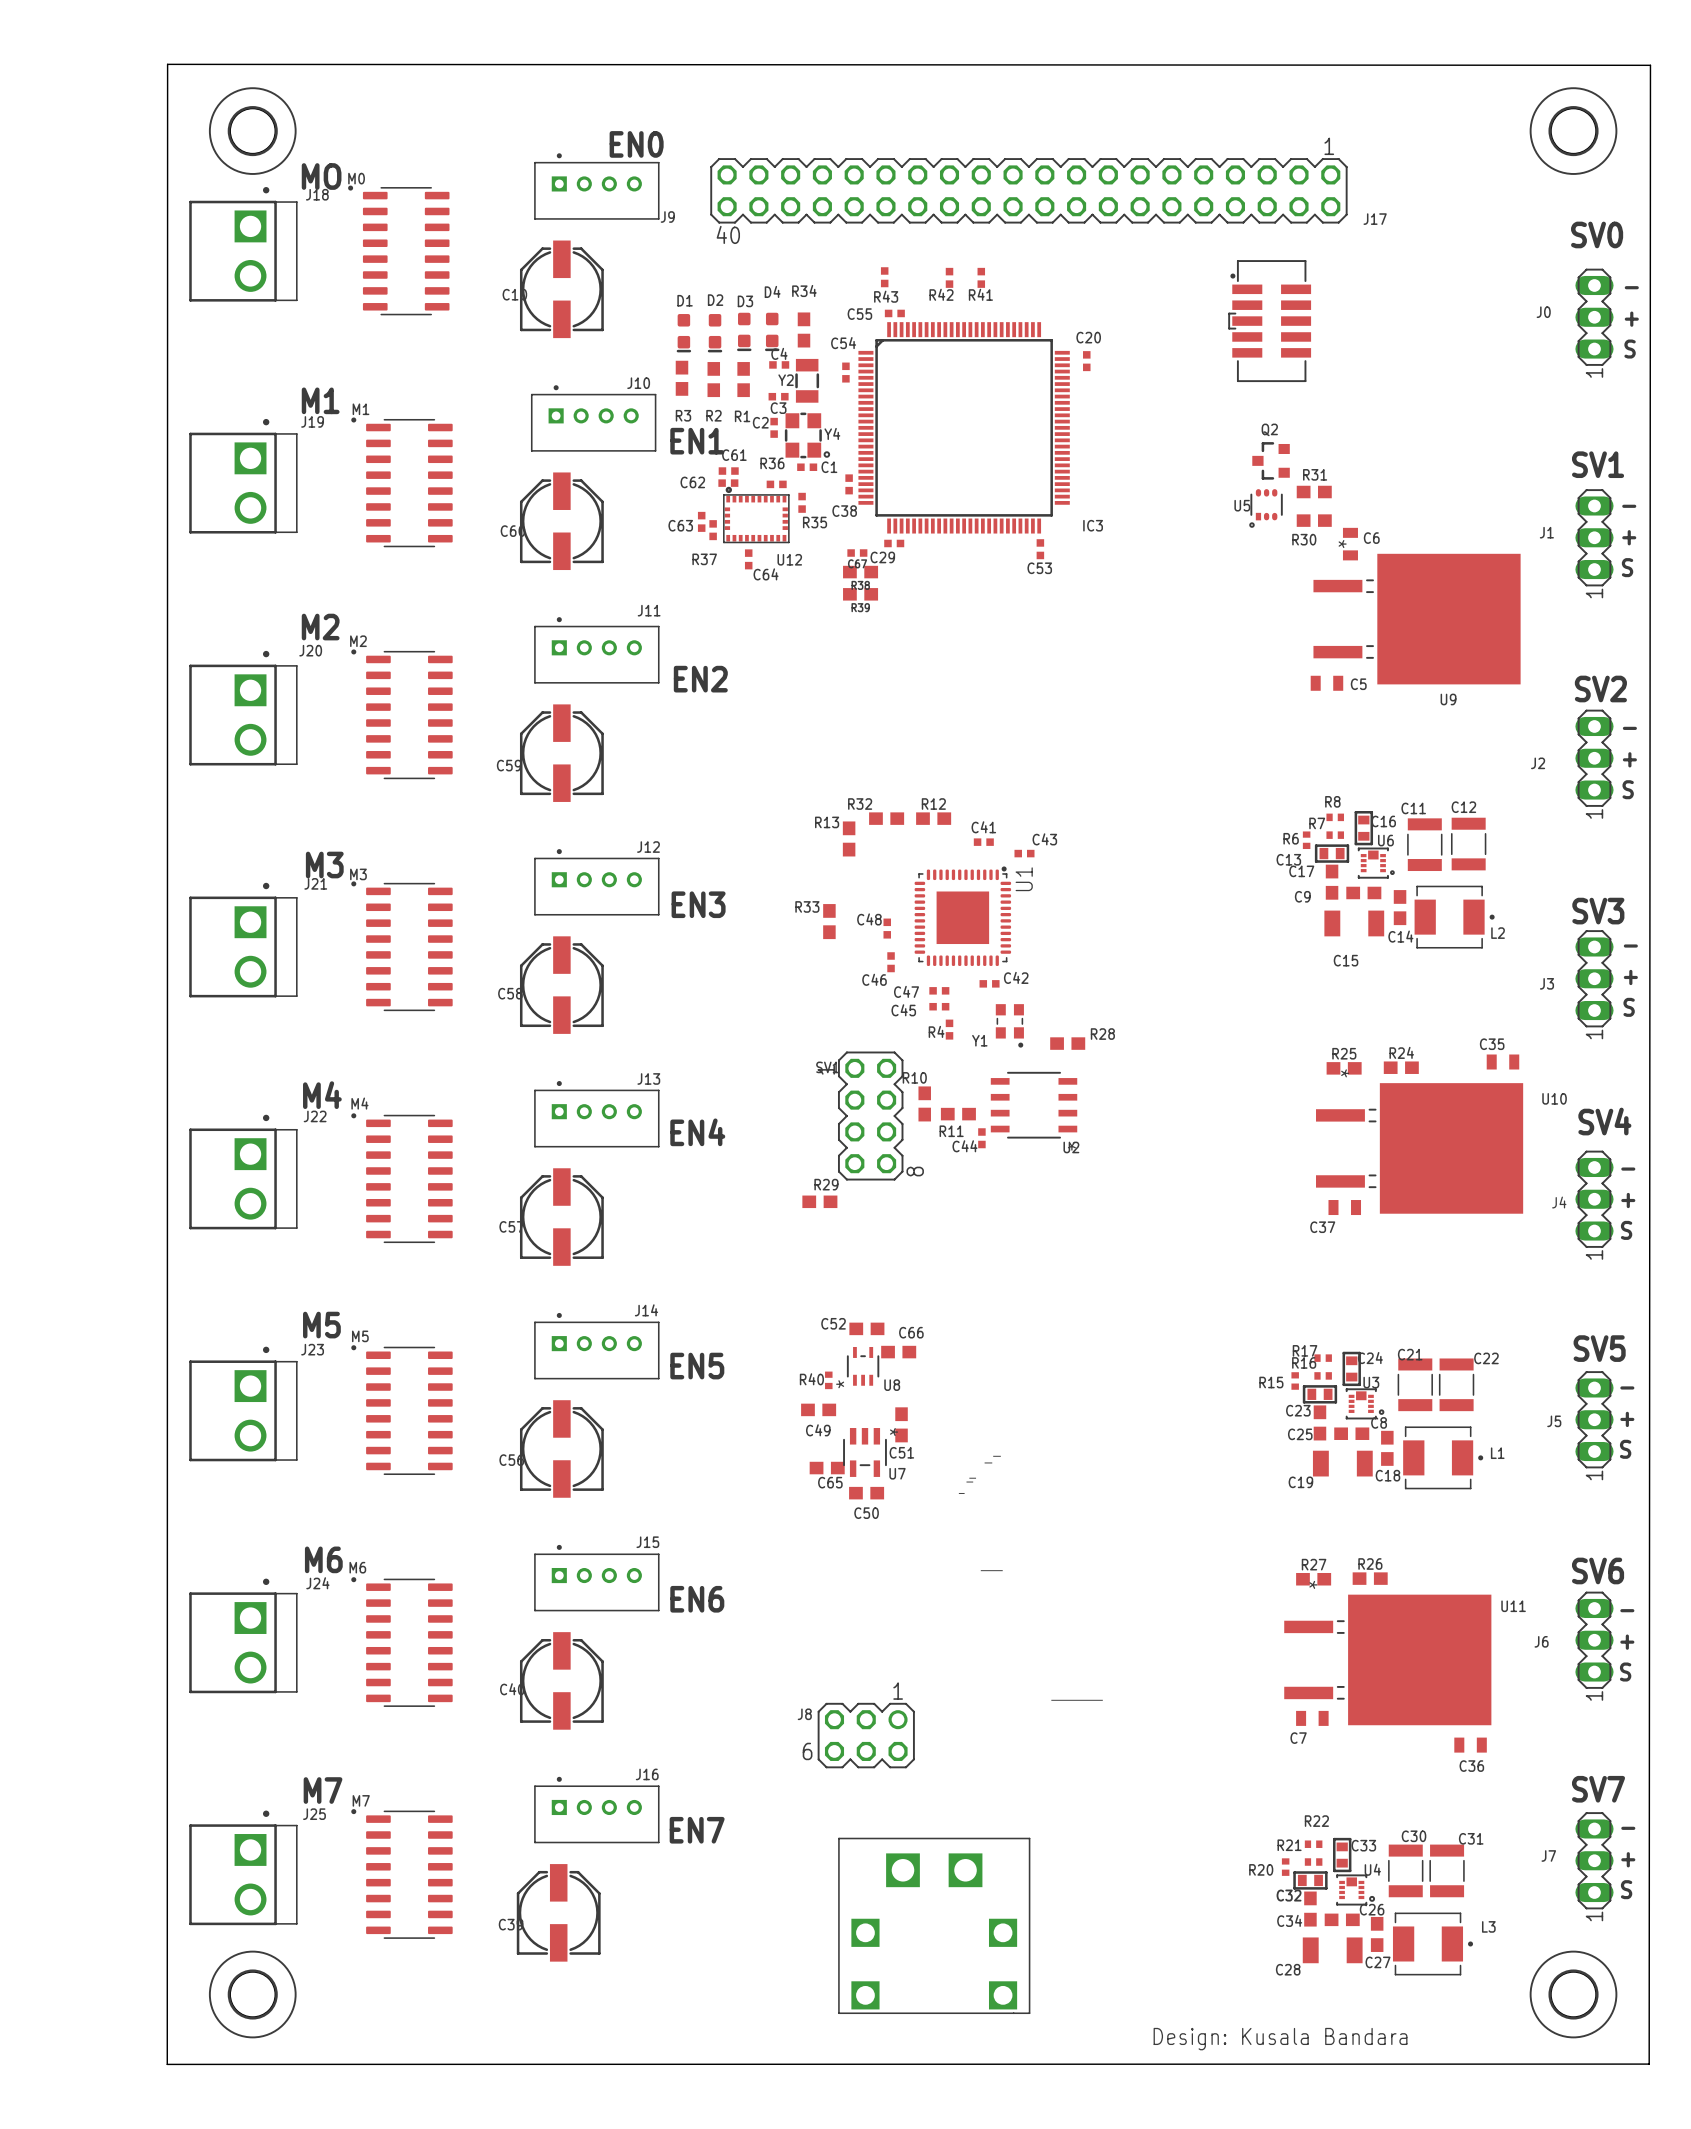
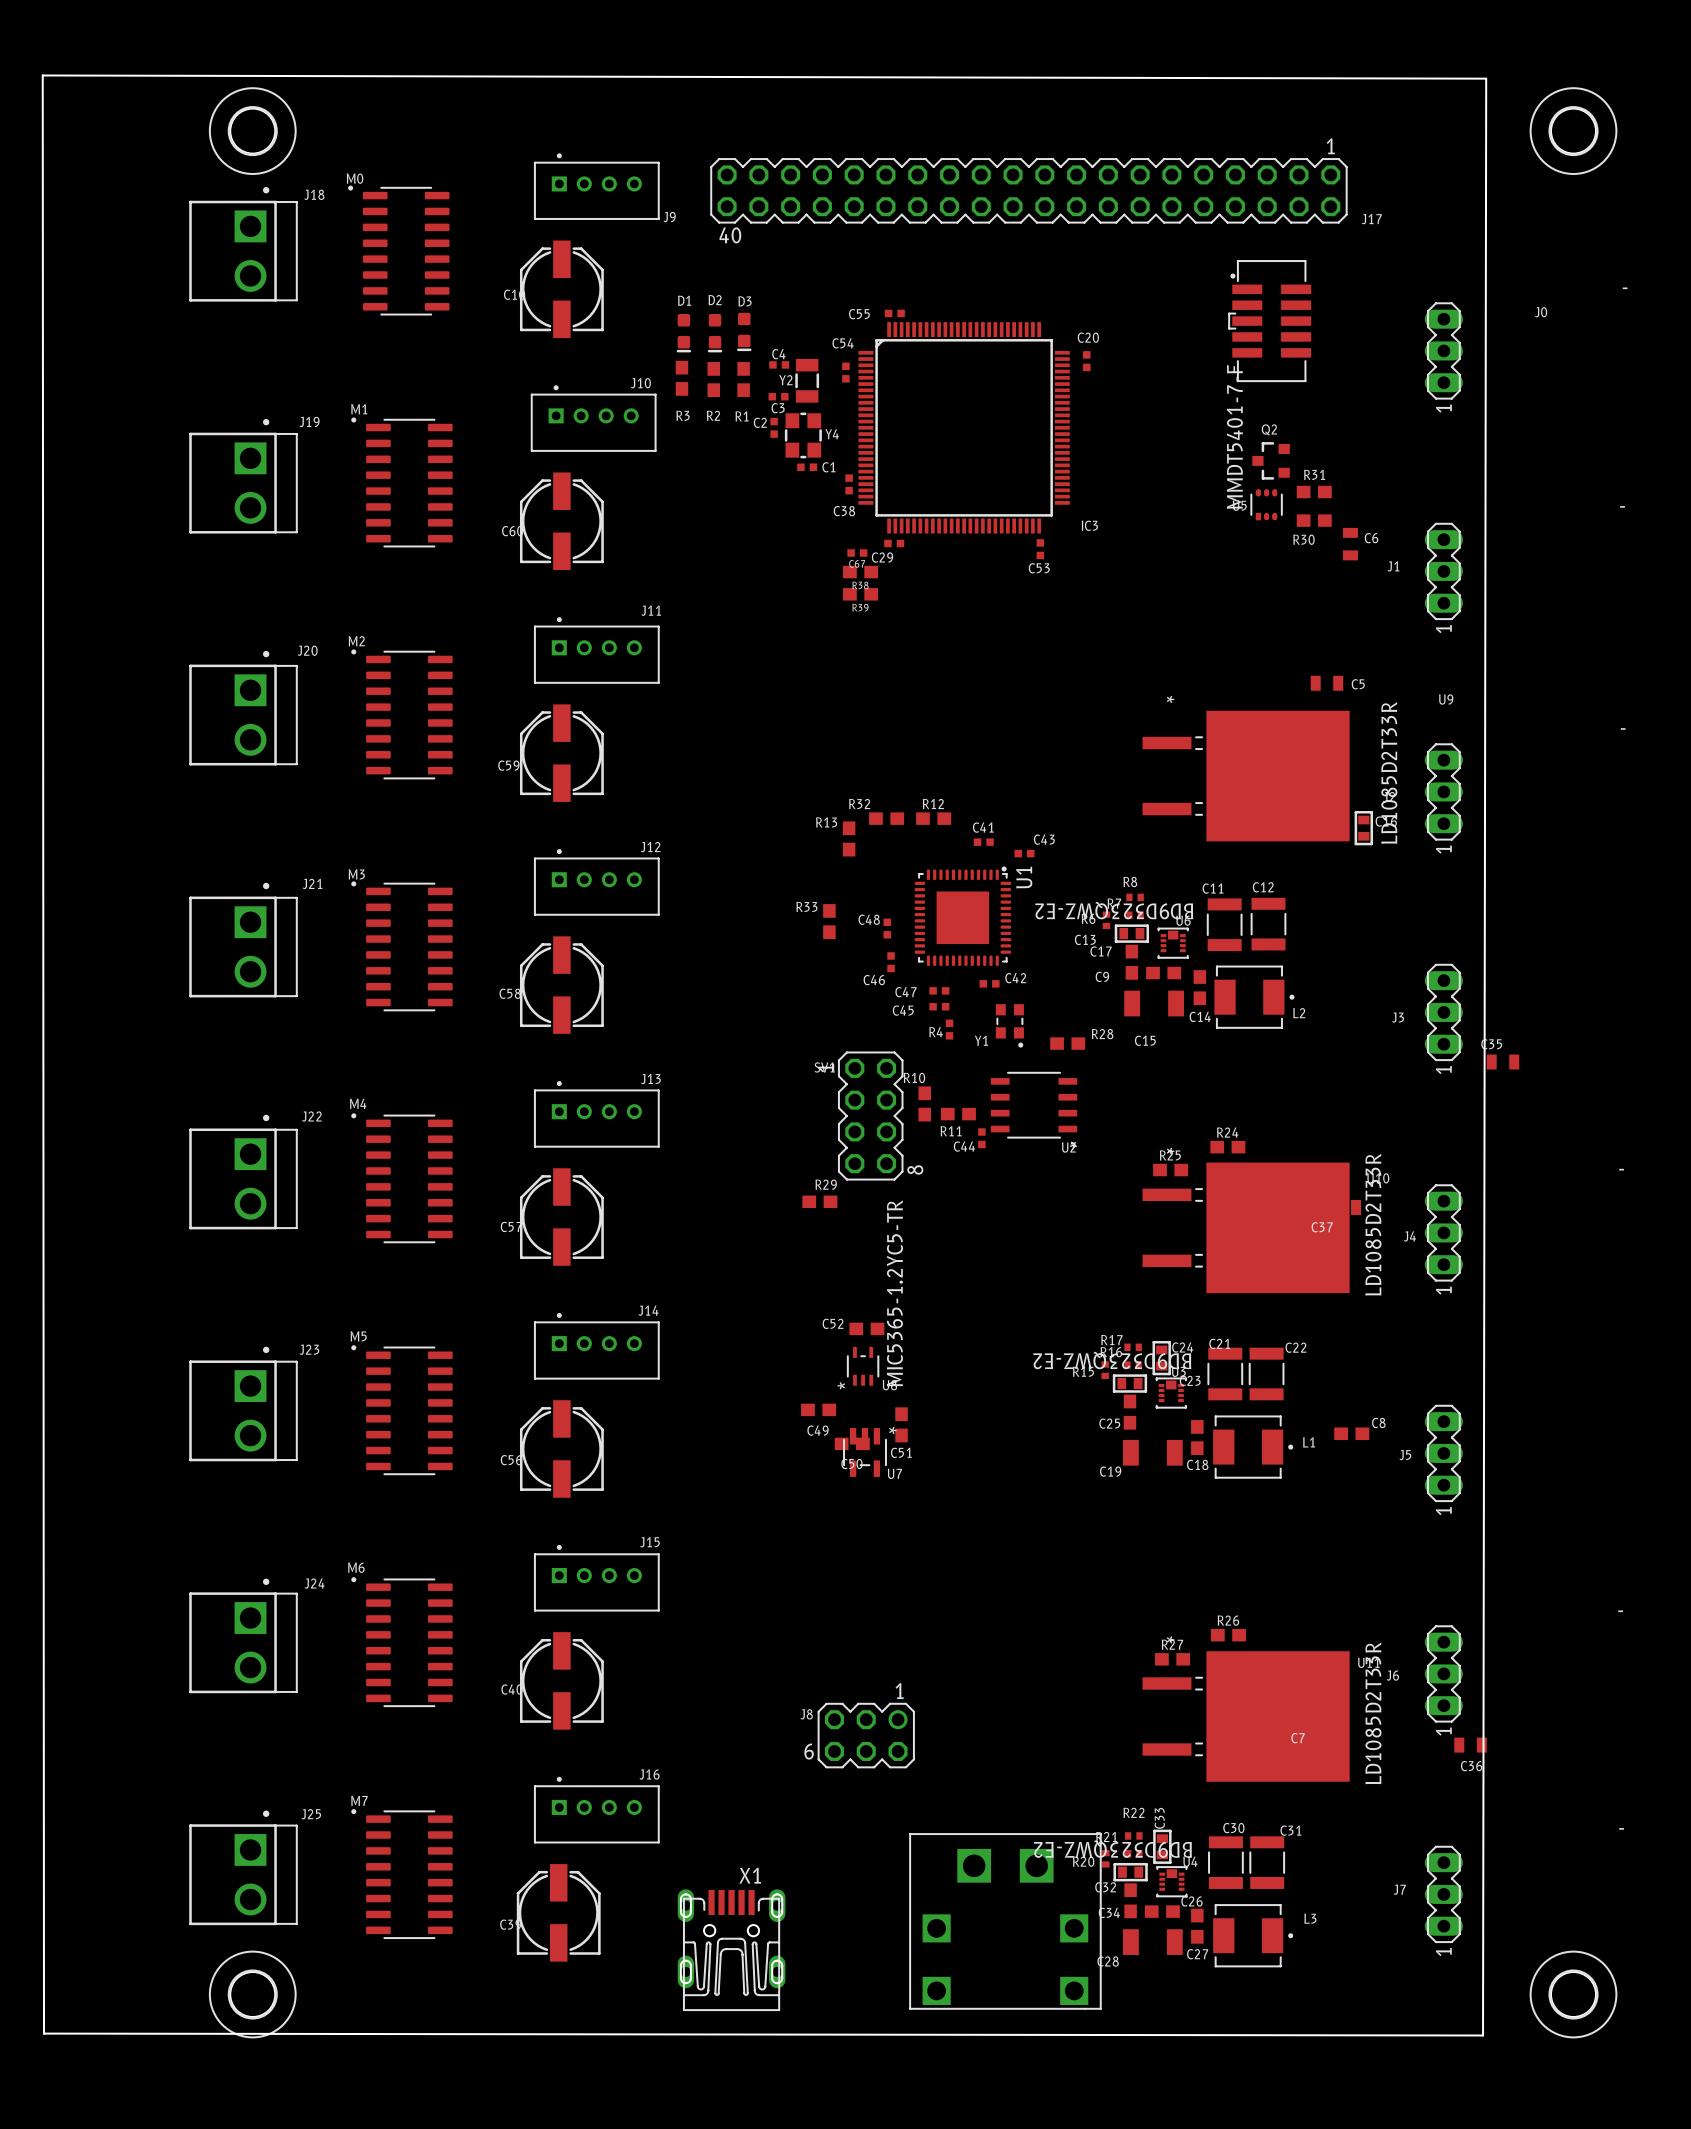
board edge: (167, 64) (1650, 65) (1649, 2064) (167, 2064) (167, 64) -> (42, 75) (44, 2033) (1483, 2035) (1486, 78) (42, 75)
text: EN0 (636, 144) -> none
text: MO (321, 176) -> none
text: SV0 (1597, 234) -> none
R43: (884, 277) -> none
R42: (949, 277) -> none
R41: (981, 277) -> none
J0 position: (1594, 317) -> (1443, 350)
text: + (1631, 319) -> none
R34: (803, 329) -> none
D4: (772, 331) -> none
text: S (1630, 349) -> none
text: M1 (320, 400) -> none
U5 value: none -> MMDT5401-7-F (1234, 436)
text: EN1 (697, 441) -> none
drawing: [823, 451, 831, 458] -> none
text: SV1 (1598, 464) -> none
C61: (728, 471) -> none
C62: (728, 483) -> none
R36: (776, 484) -> none
R35: (802, 502) -> none
U12: (756, 515) -> none
C63: (701, 521) -> none
drawing: [1249, 522, 1255, 528] -> none
R37: (713, 530) -> none
J1 position: (1594, 537) -> (1443, 571)
text: + (1629, 537) -> none
C64: (748, 559) -> none
text: S (1627, 567) -> none
U9 position: (1417, 619) -> (1246, 776)
text: M2 (320, 627) -> none
text: EN2 (700, 679) -> none
text: SV2 (1600, 689) -> none
J2 position: (1594, 758) -> (1443, 791)
text: + (1629, 759) -> none
U9 value: none -> LD1085D2T33R (1389, 772)
text: S (1628, 789) -> none
R8 position: (1335, 817) -> (1135, 897)
R7 position: (1335, 835) -> (1135, 915)
R6 position: (1306, 840) -> (1106, 920)
C11 position: (1424, 844) -> (1224, 924)
C12 position: (1468, 844) -> (1268, 924)
C13 position: (1332, 853) -> (1131, 933)
U6 position: (1373, 863) -> (1173, 943)
text: M3 (324, 865) -> none
drawing: [1390, 870, 1395, 876] -> none
C17 position: (1332, 882) -> (1131, 962)
C9 position: (1363, 892) -> (1163, 973)
text: EN3 (698, 904) -> none
C14 position: (1400, 907) -> (1199, 987)
U6 value: none -> BD9D323QWZ-E2 (1114, 910)
text: SV3 (1598, 911) -> none
L2 position: (1454, 917) -> (1254, 997)
C15 position: (1354, 923) -> (1154, 1003)
text: - (1630, 946) -> none
text: + (1630, 977) -> none
J3 position: (1594, 978) -> (1443, 1012)
text: S (1629, 1007) -> none
R24 position: (1401, 1067) -> (1227, 1147)
R25 position: (1344, 1068) -> (1170, 1170)
text: M4 (322, 1095) -> none
text: SV4 (1604, 1121) -> none
text: EN4 (697, 1132) -> none
U10 position: (1419, 1148) -> (1246, 1227)
J4 position: (1594, 1199) -> (1443, 1232)
text: + (1628, 1200) -> none
U10 value: none -> LD1085D2T33R (1373, 1224)
text: S (1626, 1230) -> none
U8 value: none -> MIC5365-1.2YC5-TR (894, 1293)
text: M5 (321, 1325) -> none
text: SV5 (1599, 1348) -> none
C66: (898, 1352) -> none
R17 position: (1323, 1358) -> (1133, 1347)
U3 value: none -> BD9D323QWZ-E2 (1112, 1360)
text: EN5 (697, 1366) -> none
C24 position: (1351, 1368) -> (1161, 1358)
R16 position: (1323, 1375) -> (1133, 1365)
R40: (828, 1380) -> none
R15 position: (1295, 1380) -> (1105, 1370)
C21 position: (1415, 1384) -> (1225, 1374)
C22 position: (1456, 1384) -> (1266, 1374)
text: - (1627, 1387) -> none
C23 position: (1319, 1394) -> (1129, 1383)
U3 position: (1361, 1403) -> (1171, 1393)
drawing: [1378, 1409, 1385, 1415] -> none
C23 name position: C23 (1298, 1410) -> C23 (1190, 1380)
J5 position: (1594, 1419) -> (1443, 1453)
text: + (1627, 1419) -> none
C25 position: (1319, 1422) -> (1129, 1412)
C18 position: (1387, 1448) -> (1197, 1437)
text: S (1625, 1449) -> none
drawing: [984, 1455, 1001, 1464] -> none
L1 position: (1443, 1457) -> (1253, 1447)
C19 position: (1342, 1463) -> (1152, 1452)
C65: (827, 1468) -> none
drawing: [958, 1477, 977, 1494] -> none
C50 position: (866, 1493) -> (852, 1443)
text: M6 (323, 1559) -> none
drawing: [980, 1570, 1003, 1572] -> none
text: SV6 (1598, 1570) -> none
R26 position: (1370, 1578) -> (1228, 1635)
R27 position: (1313, 1579) -> (1172, 1659)
text: EN6 (697, 1599) -> none
J6 position: (1594, 1640) -> (1443, 1673)
text: + (1627, 1642) -> none
U11 position: (1387, 1659) -> (1246, 1716)
text: S (1625, 1672) -> none
drawing: [1051, 1699, 1103, 1701] -> none
U11 value: none -> LD1085D2T33R (1373, 1713)
text: SV7 (1598, 1789) -> none
text: M7 (323, 1790) -> none
text: EN7 (697, 1830) -> none
R22 position: (1313, 1844) -> (1133, 1835)
C33 name rotation: 0° (1363, 1845) -> 90° counterclockwise (1159, 1818)
C33 name position: C33 (1363, 1845) -> C33 (1159, 1818)
U4 value: none -> BD9D323QWZ-E2 (1113, 1849)
C33 position: (1342, 1855) -> (1162, 1846)
text: + (1628, 1859) -> none
J7 position: (1594, 1860) -> (1443, 1894)
R21 position: (1313, 1862) -> (1133, 1853)
R20 position: (1285, 1867) -> (1105, 1858)
C30 position: (1405, 1870) -> (1225, 1862)
C31 position: (1447, 1870) -> (1267, 1862)
C32 position: (1310, 1880) -> (1130, 1872)
U4 position: (1351, 1889) -> (1171, 1881)
text: S (1626, 1889) -> none
drawing: [1369, 1895, 1376, 1902] -> none
C34 position: (1310, 1909) -> (1130, 1900)
C26 position: (1342, 1919) -> (1162, 1911)
part position: (934, 1925) -> (1005, 1921)
C27 position: (1377, 1934) -> (1197, 1926)
L3 position: (1433, 1943) -> (1253, 1935)
X1: none -> (731, 1950)
C28 position: (1332, 1950) -> (1152, 1942)
text: Design: Kusala Bandara (1280, 2039) -> none

